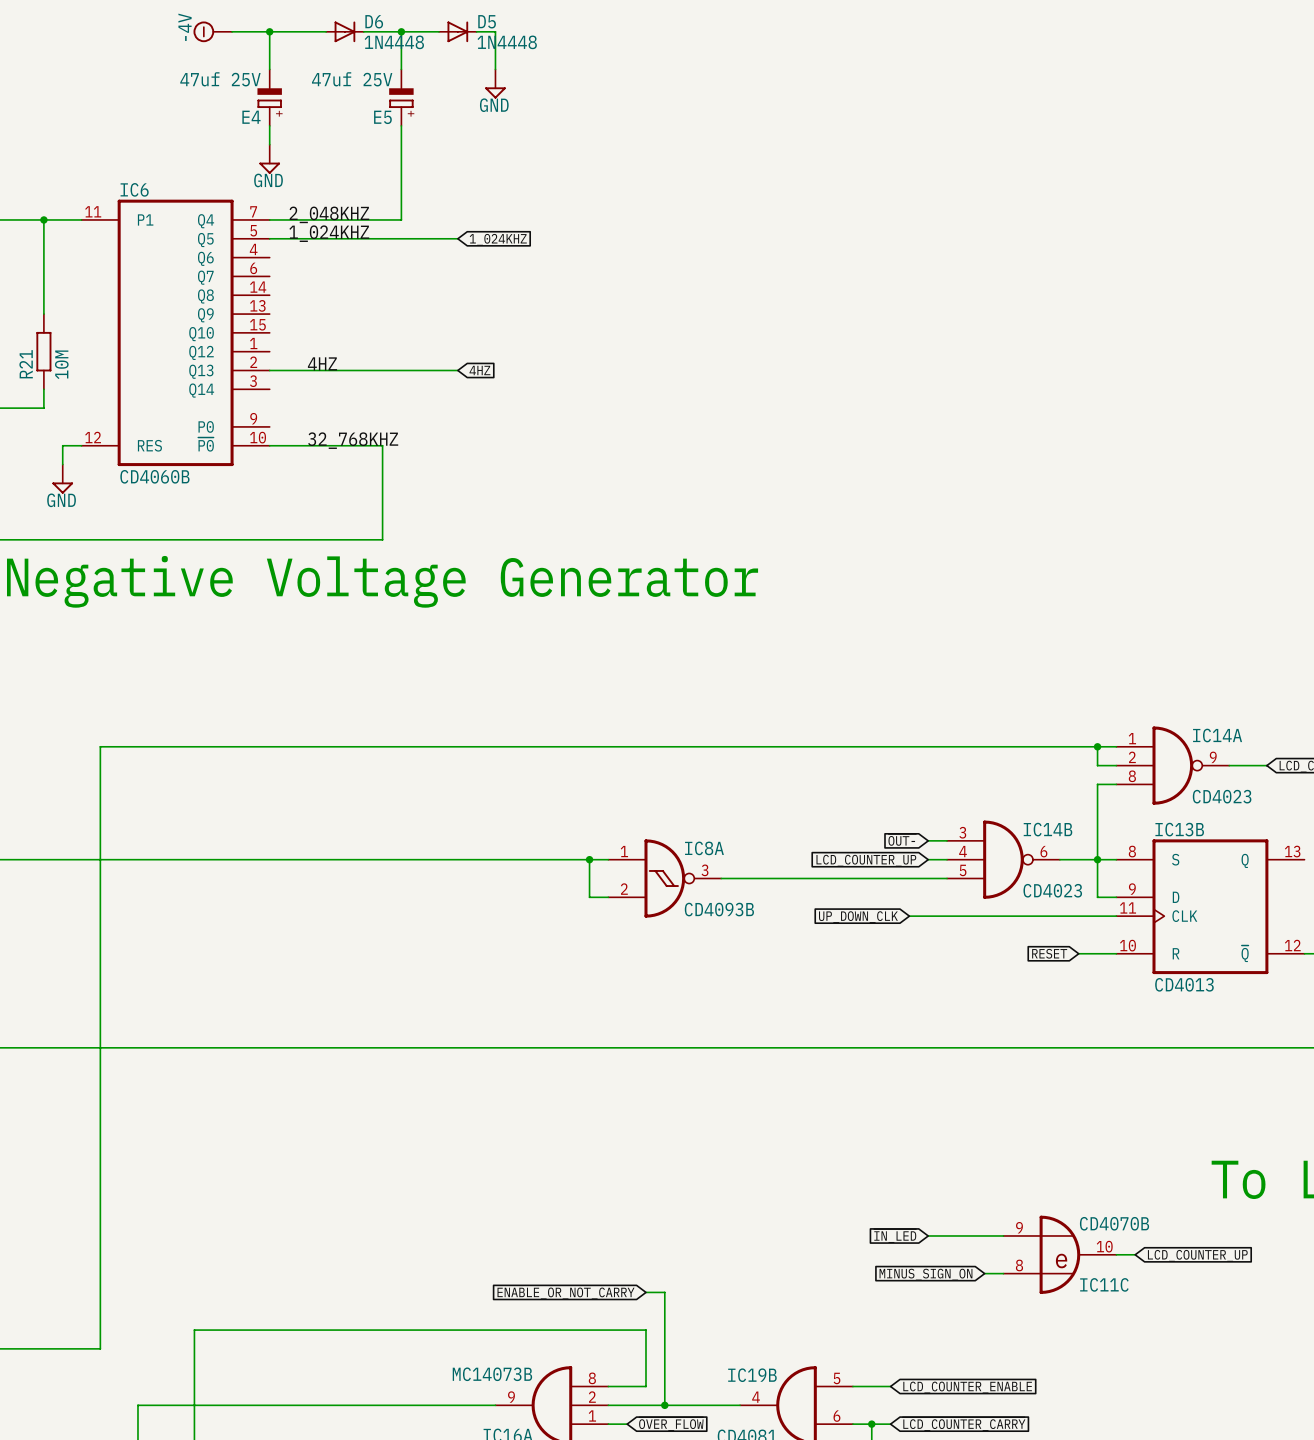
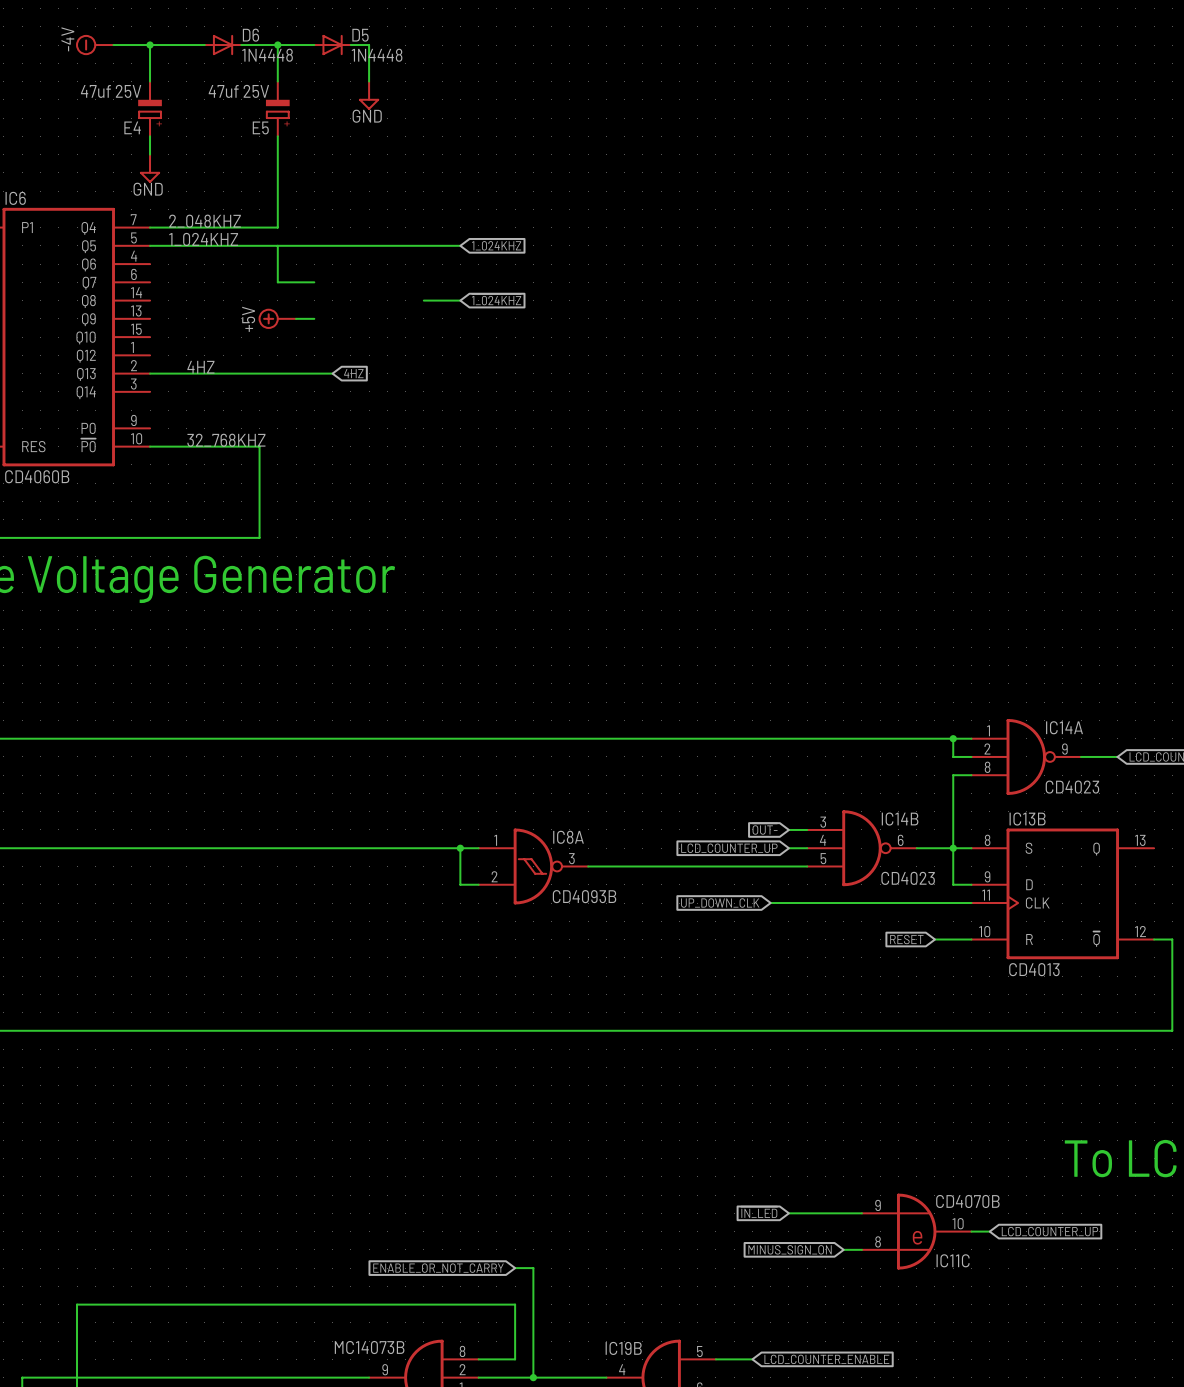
wire: none -> (277, 245) (277, 282) (314, 282)
wire: none -> (332, 245) (460, 245)
global label position: 1_024KHZ (498, 239) -> 1_024KHZ (496, 245)
wire: none -> (423, 300) (460, 300)
global label: none -> ~{1_024KHZ} (496, 299)
power symbol: none -> +5V (277, 318)
wire: none -> (296, 318) (314, 318)

